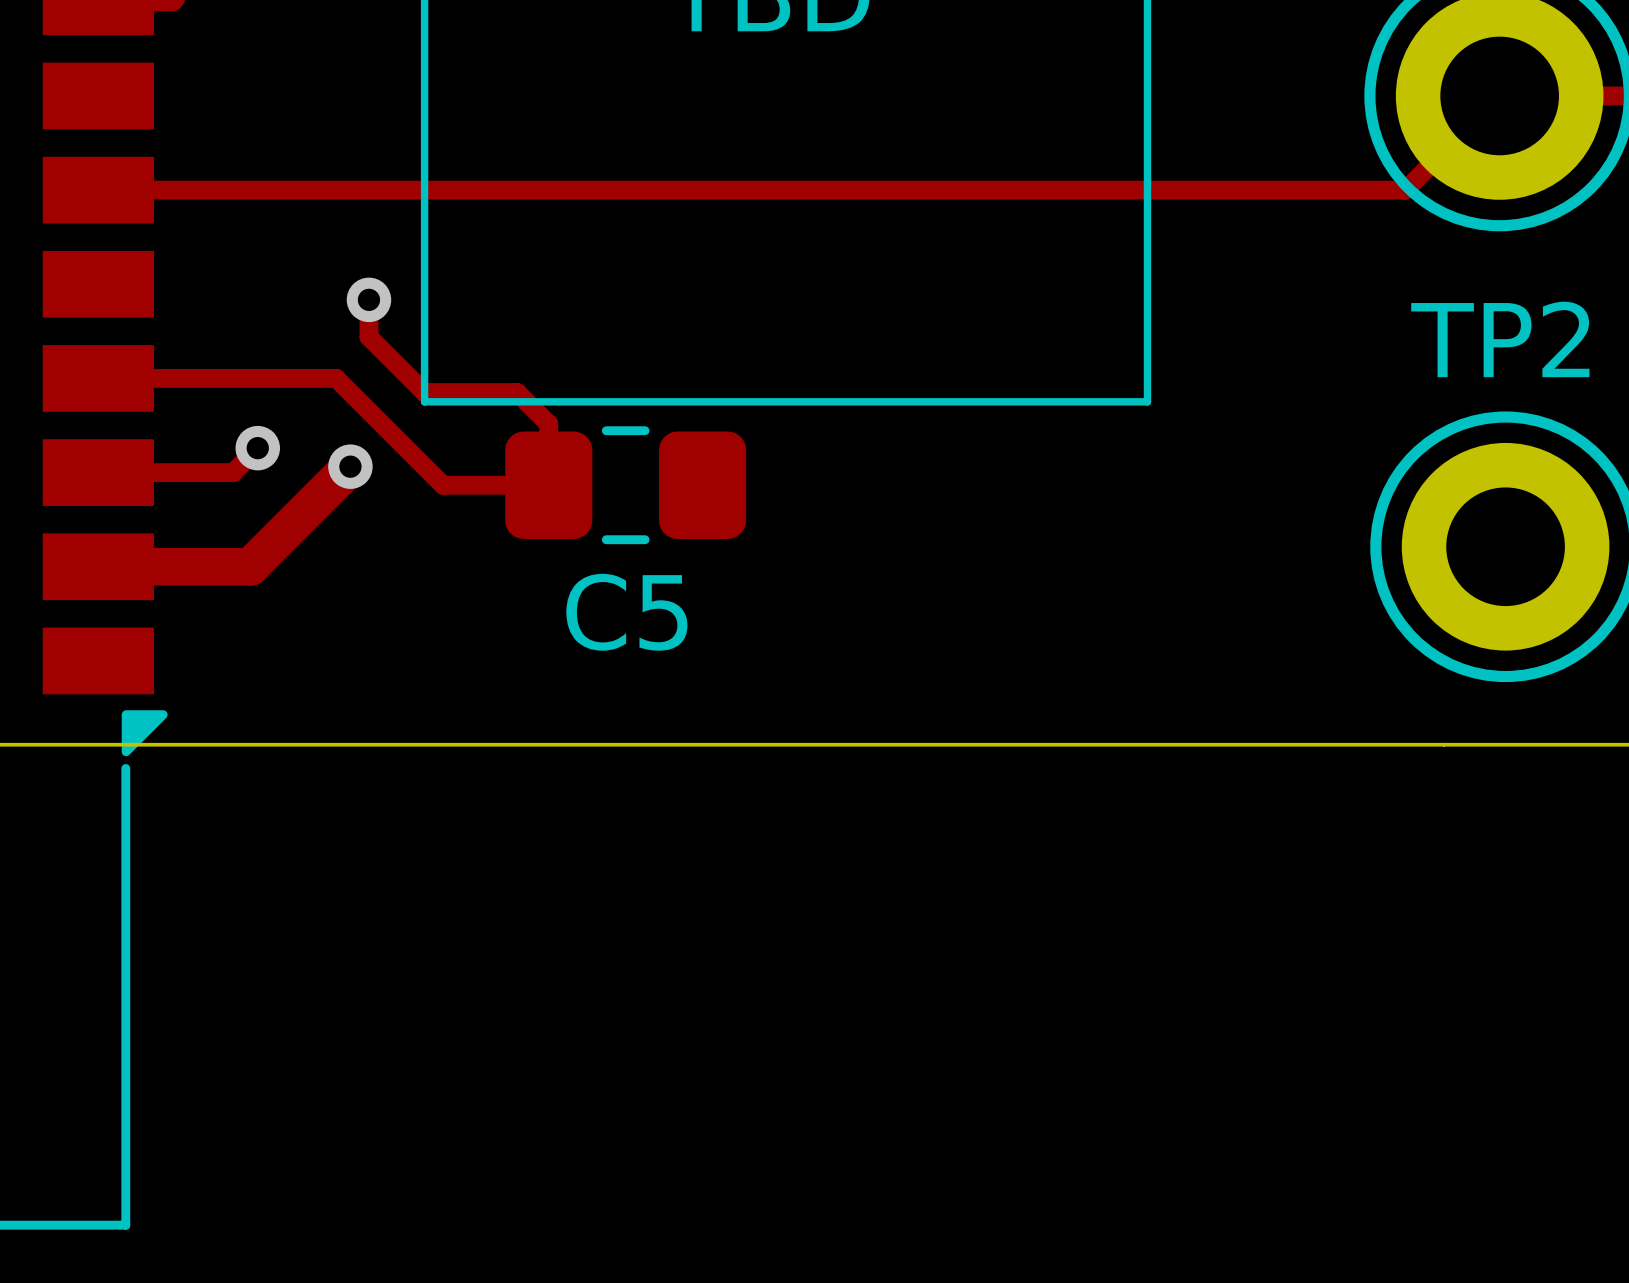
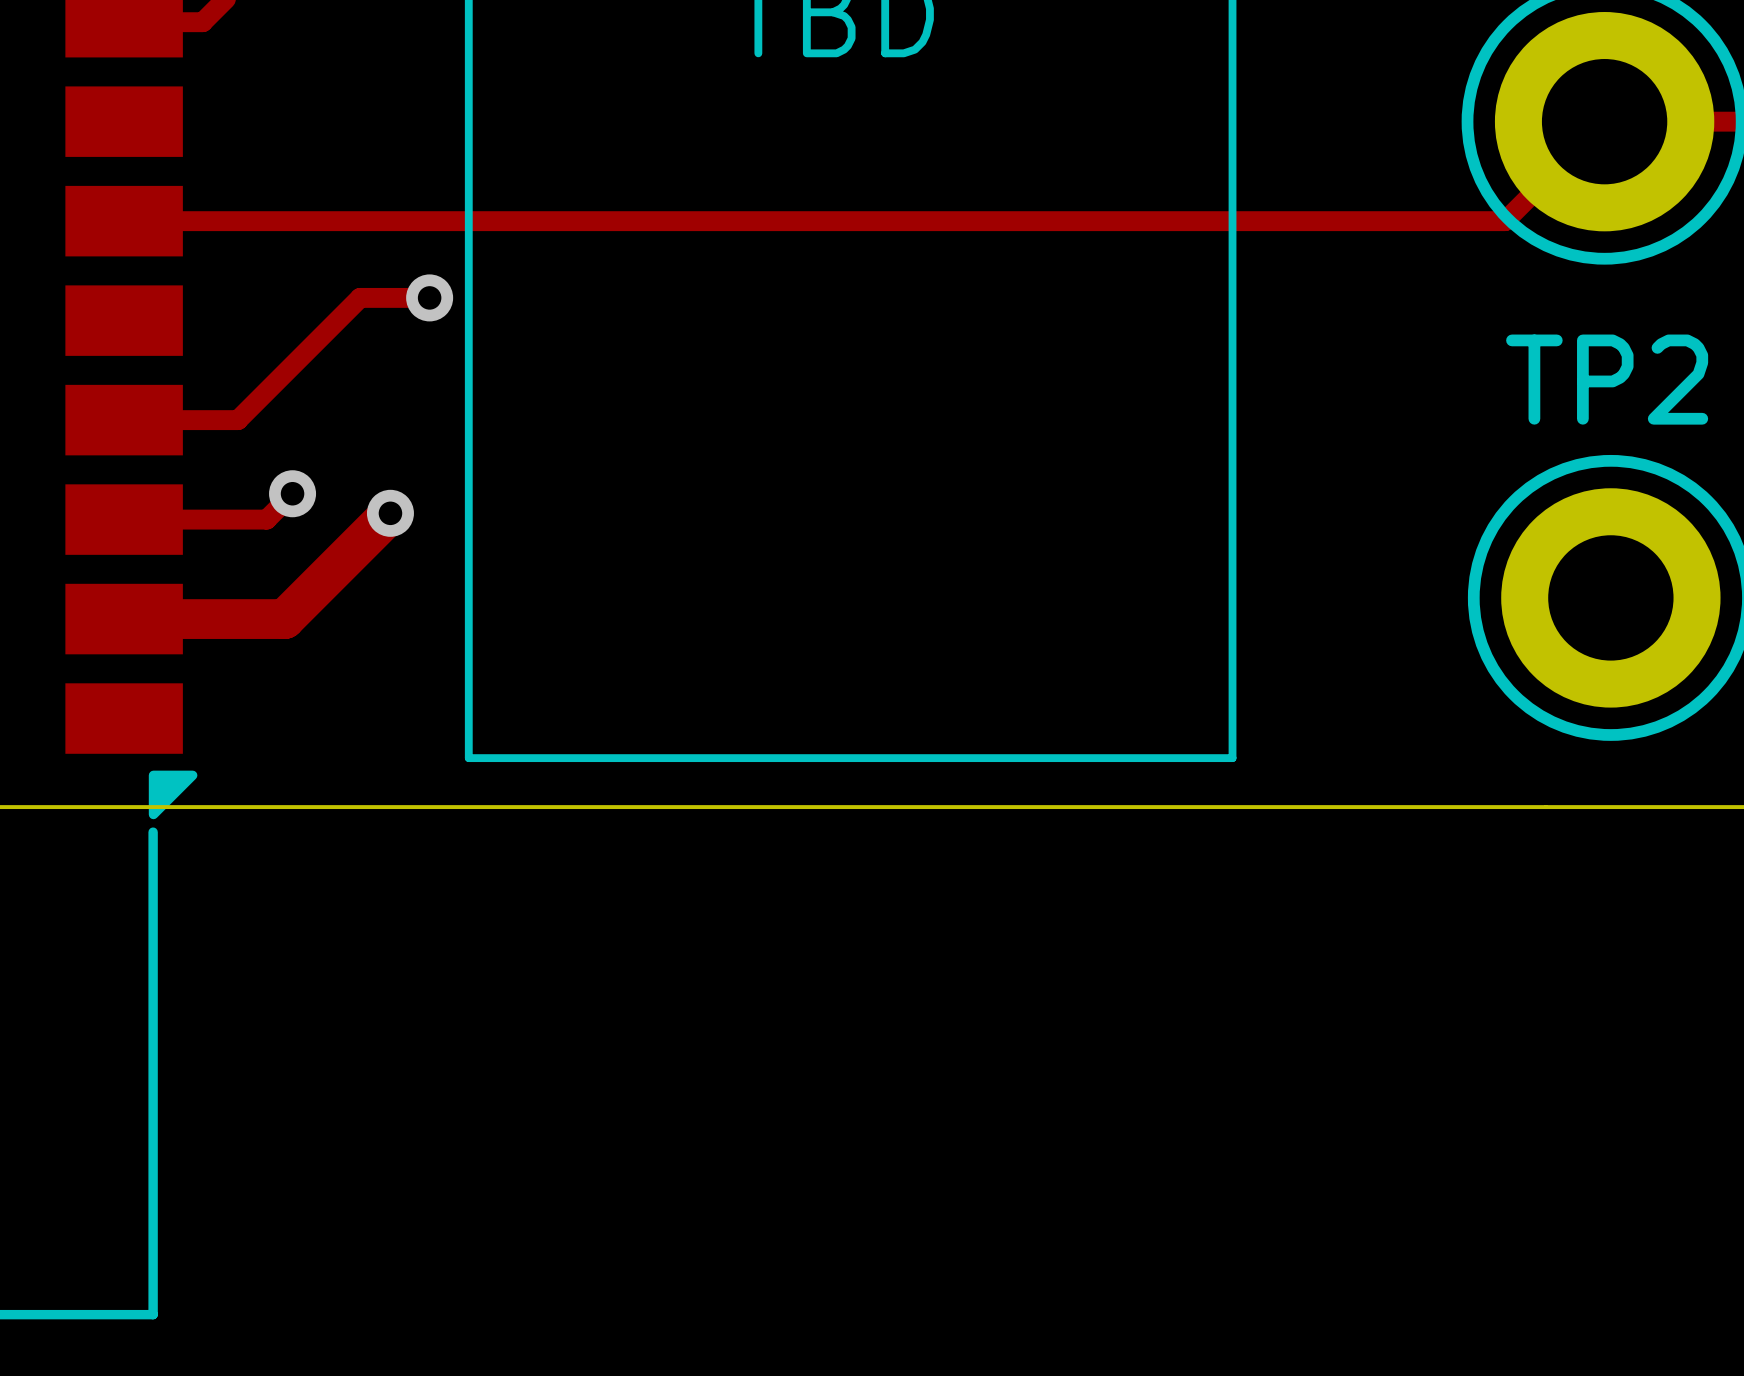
track: (368, 299) (368, 336) (424, 392) (517, 392) (548, 424) (548, 485) (443, 485) (336, 378) (206, 378) -> (429, 297) (360, 297) (237, 420)
via position: (368, 299) -> (429, 297)
line: (424, 401) (1147, 401) -> (468, 444) (468, 758) (1232, 758) (1232, 444)
C5: (625, 485) -> none

